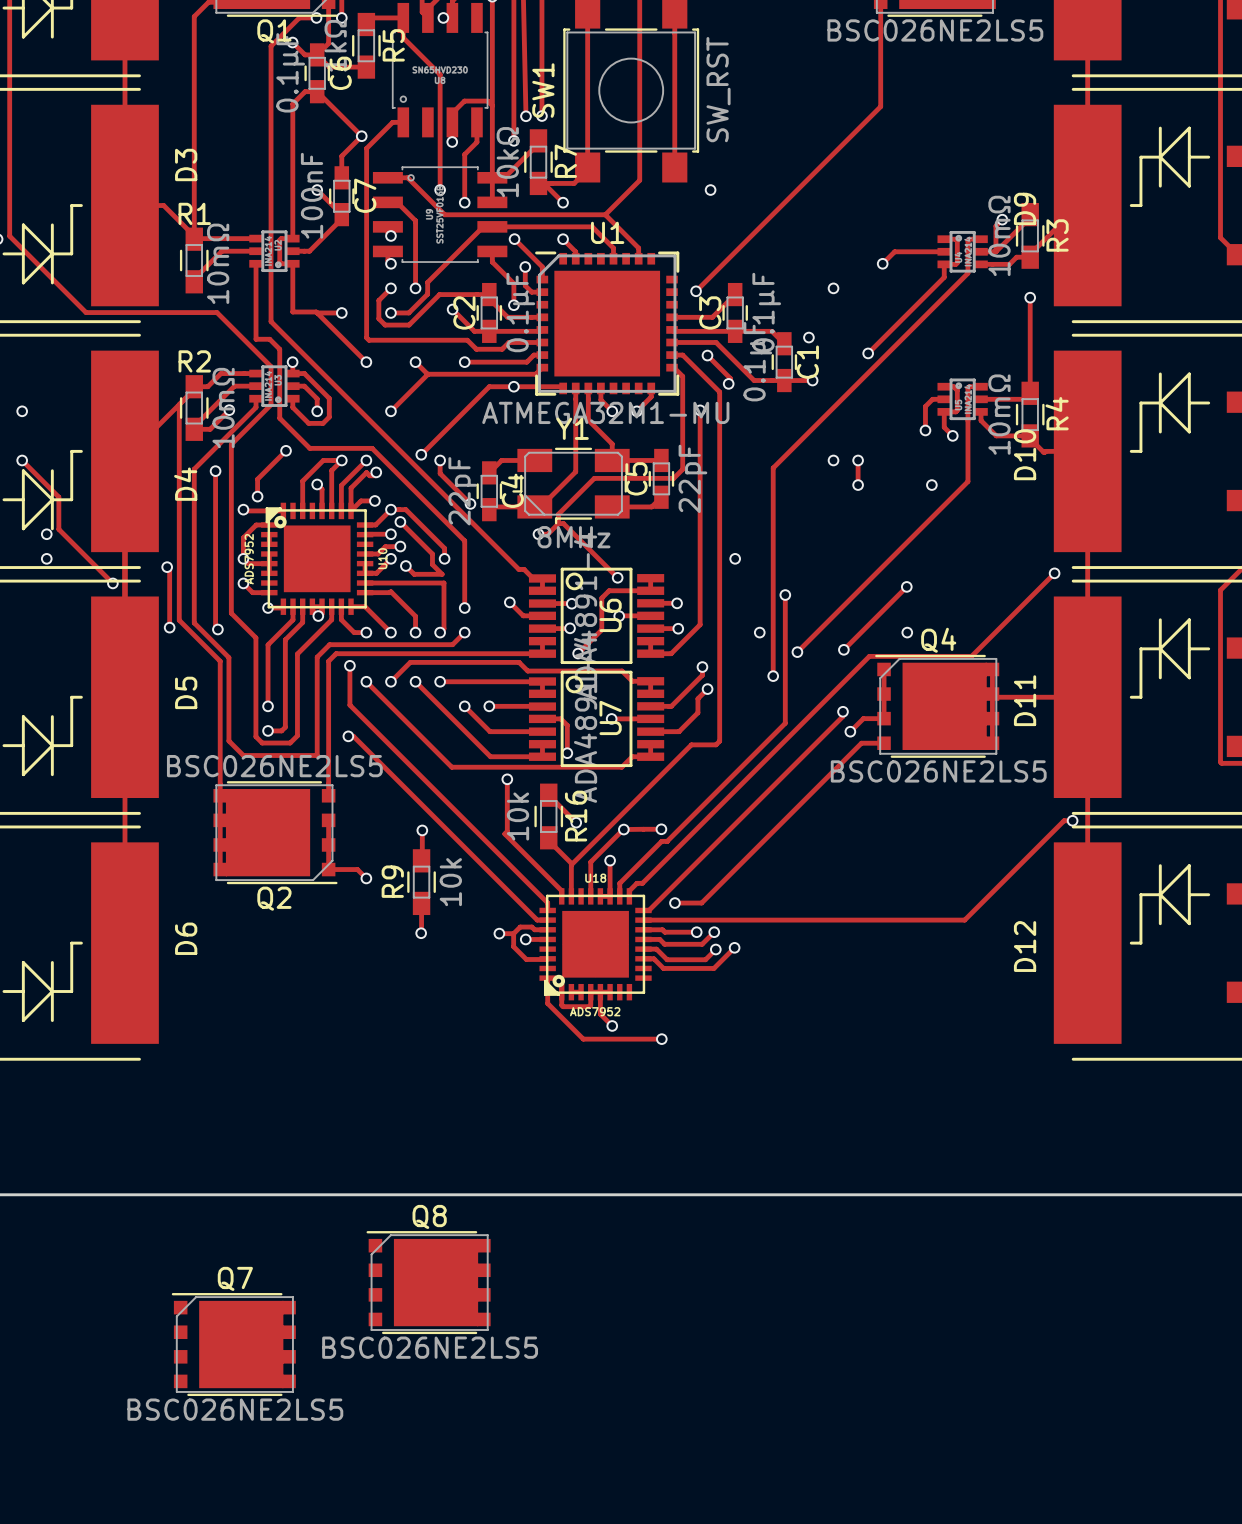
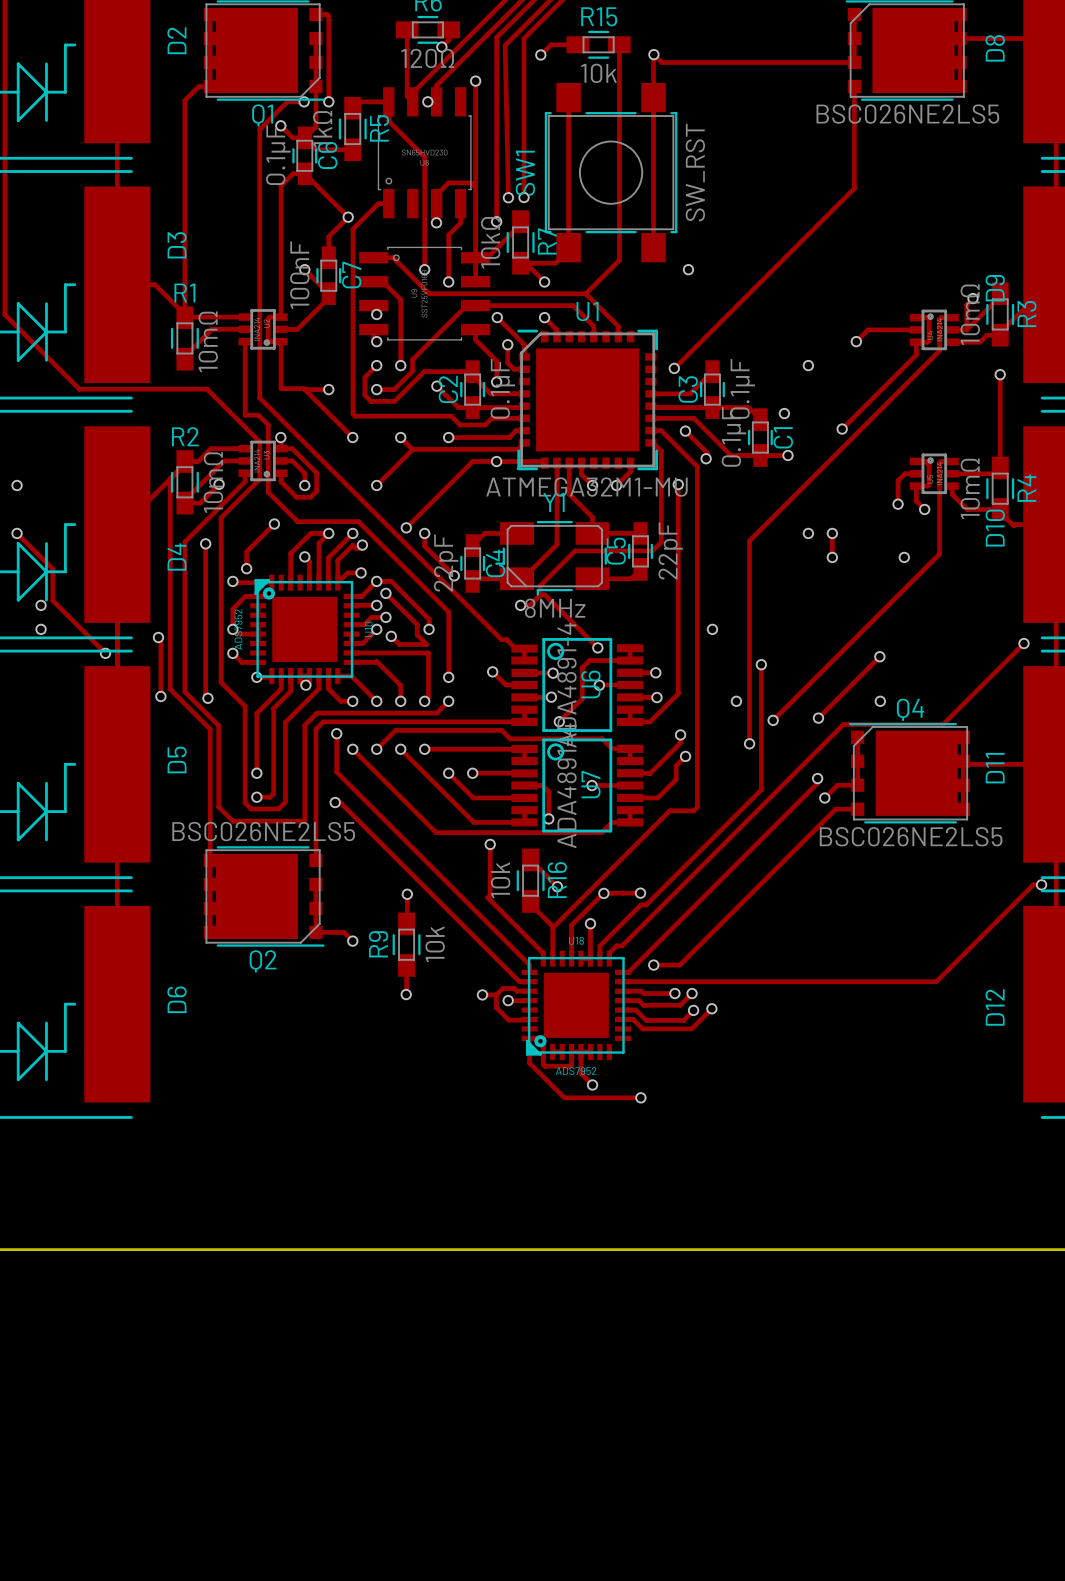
Q8: BSC026NE2LS5 (428, 1282) -> none
Q7: BSC026NE2LS5 (233, 1344) -> none

